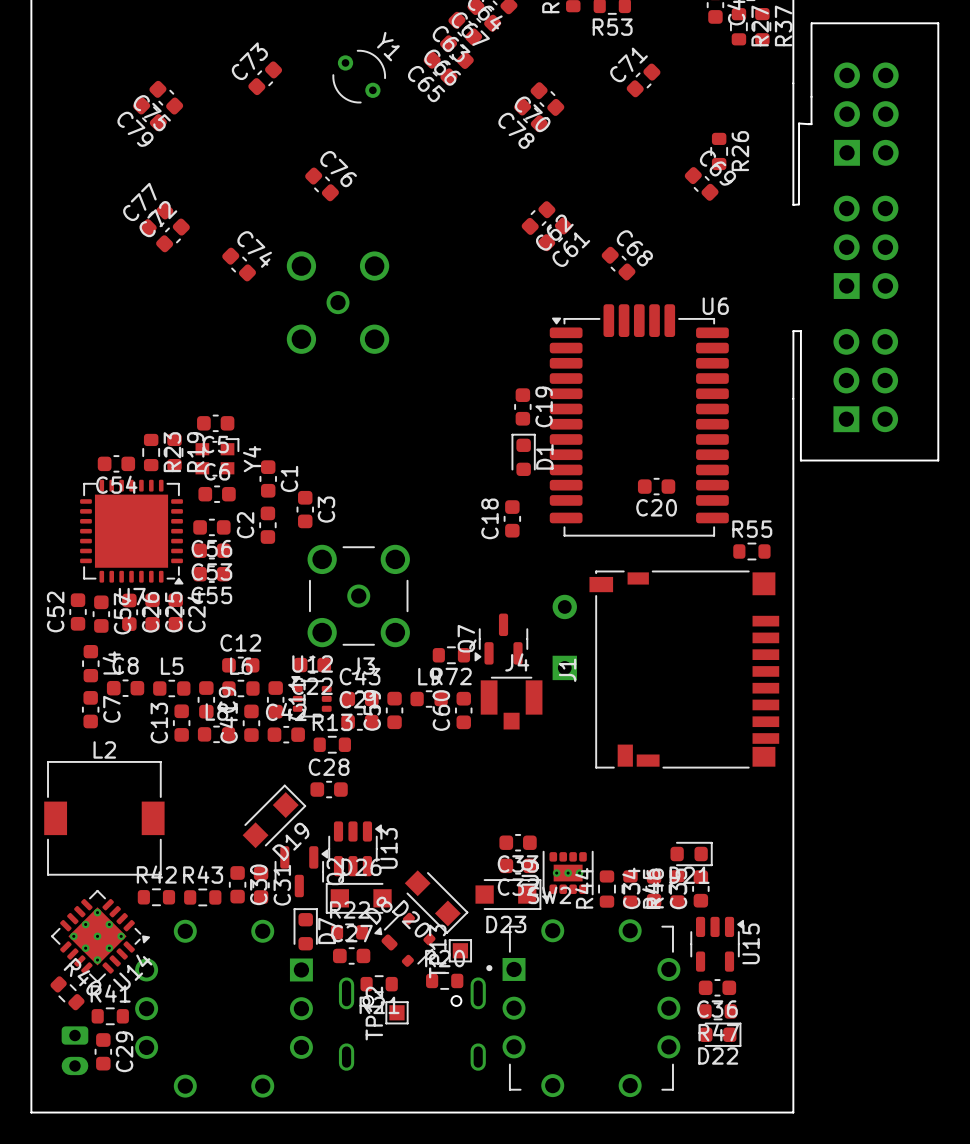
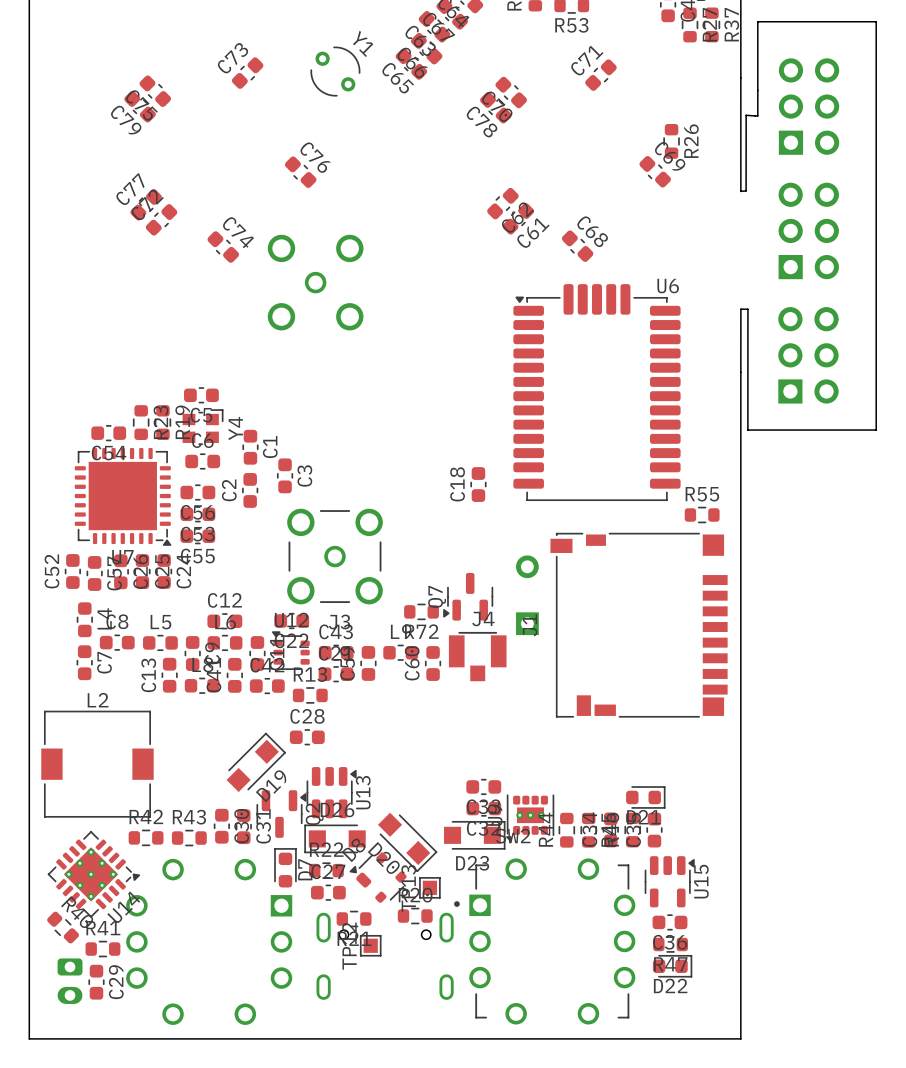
C19: (522, 406) -> none
D1: (523, 454) -> none
C20: (656, 486) -> none

